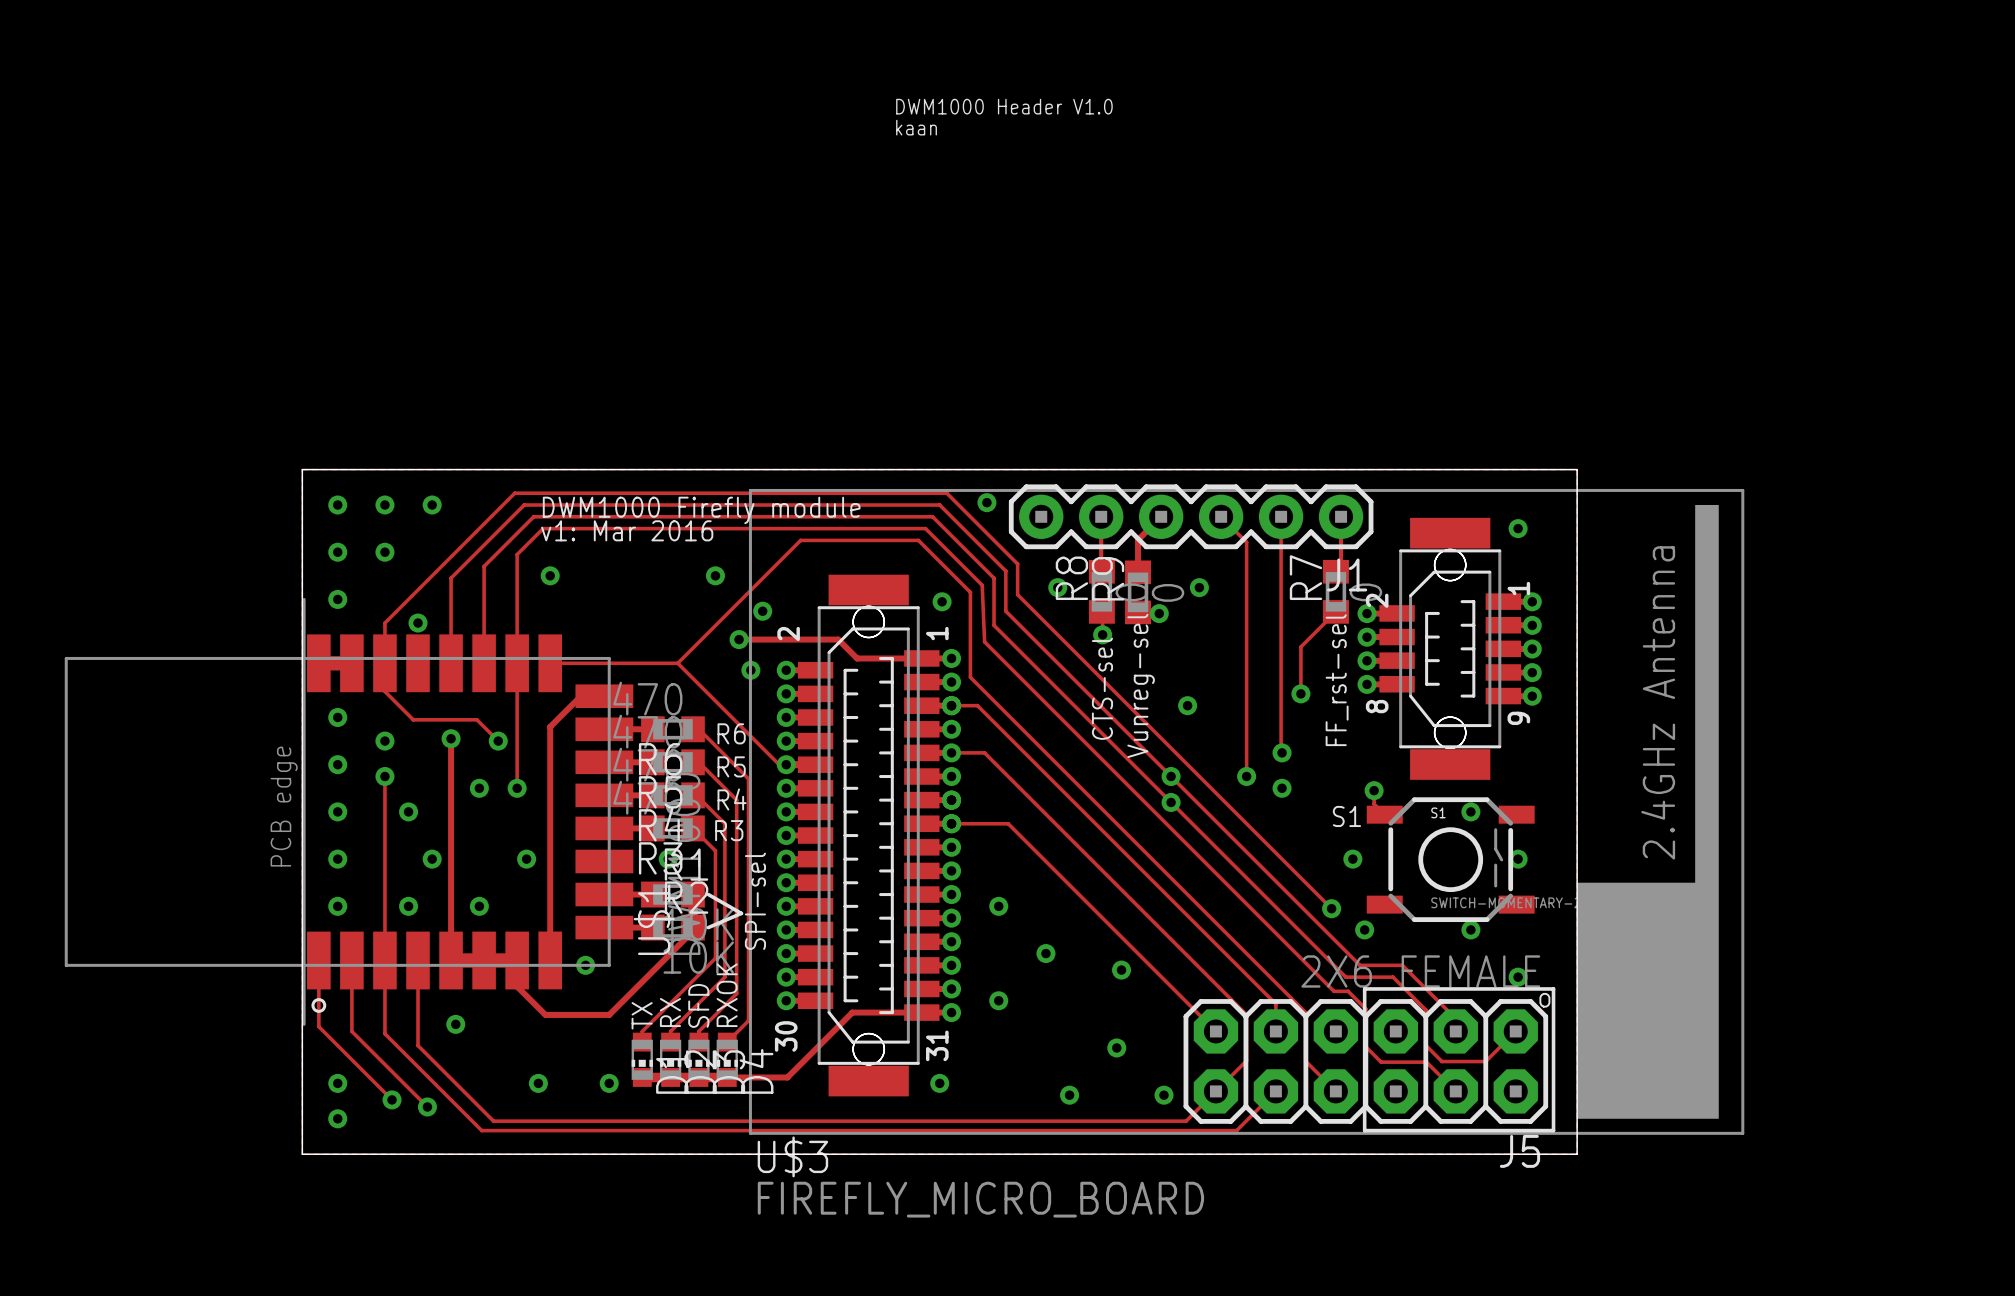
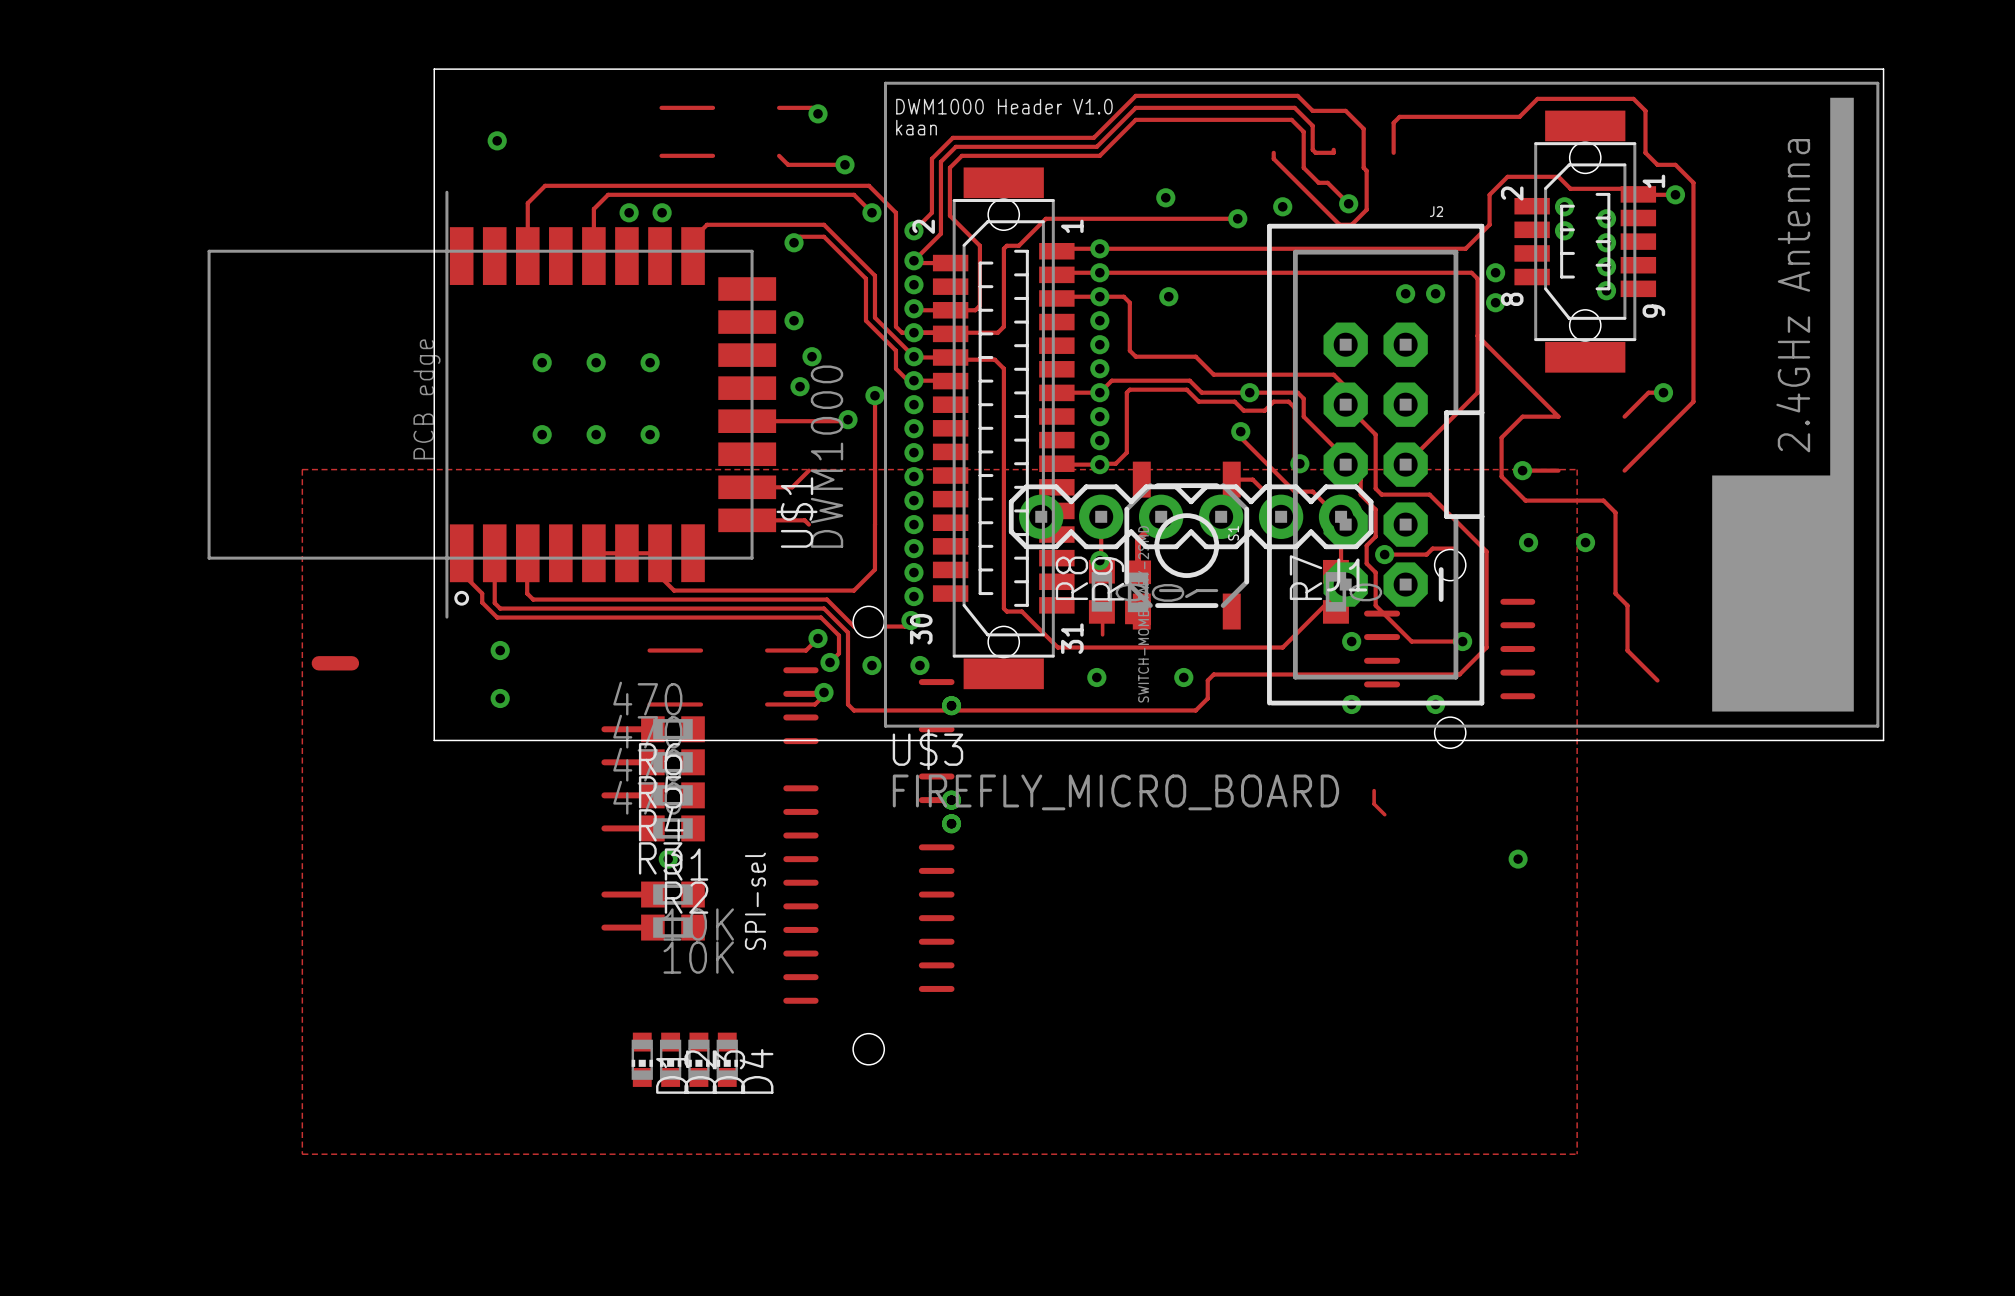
board edge: none -> (434, 69) (1883, 69) (1883, 740) (434, 740) (434, 69)
track: none -> (661, 107) (713, 107)
track: none -> (779, 107) (812, 107) (818, 113)
via: none -> (818, 113)
via: none -> (497, 140)
track: none -> (1333, 149) (1333, 152) (1315, 152) (1312, 149) (1312, 125) (1294, 107) (1135, 107) (1096, 146) (955, 146) (940, 161) (940, 233) (913, 260) (916, 263) (950, 263)
track: none -> (1273, 152) (1273, 158) (1339, 224) (1351, 224) (1366, 209) (1363, 128) (1345, 110) (1312, 110) (1297, 95) (1135, 95) (1093, 137) (952, 137) (931, 158) (931, 212) (913, 230)
track: none -> (1393, 152) (1393, 122) (1399, 116) (1519, 116) (1537, 98) (1633, 98) (1645, 110) (1645, 152) (1657, 164) (1675, 164) (1693, 182) (1693, 401) (1624, 470)
track: none -> (661, 155) (713, 155)
track: none -> (779, 155) (788, 164) (844, 164)
via: none -> (844, 164)
track: none -> (1675, 194) (1638, 194) (1632, 188) (1570, 188) (1558, 176) (1507, 176) (1489, 194) (1489, 224) (1465, 248) (1059, 248) (1056, 251)
via: none -> (1675, 194)
via: none -> (1165, 197)
track: none -> (1348, 203) (1327, 182) (1318, 182) (1303, 167) (1303, 131) (1291, 119) (1135, 119) (1099, 155) (961, 155) (949, 167) (949, 215) (979, 245) (979, 305) (975, 310) (915, 310) (913, 308)
via: none -> (1348, 203)
via: none -> (1282, 206)
via: none -> (1564, 206)
via: none -> (629, 212)
via: none -> (662, 212)
track: none -> (871, 212) (853, 194) (608, 194) (593, 209) (593, 256)
via: none -> (871, 212)
track: none -> (1237, 218) (1045, 218) (1018, 245) (1006, 245) (1003, 248) (1003, 326) (997, 332) (901, 332) (895, 326) (895, 212) (868, 185) (545, 185) (527, 203) (527, 256)
via: none -> (1237, 218)
via: none -> (1606, 218)
via: none -> (913, 230)
via: none -> (1564, 230)
track: none -> (794, 242) (800, 236) (824, 236) (865, 278) (865, 320) (895, 350) (895, 368) (907, 380) (950, 381)
via: none -> (794, 242)
via: none -> (1606, 242)
via: none -> (1099, 248)
track: none -> (693, 256) (693, 238) (707, 224) (824, 224) (874, 275) (874, 317) (914, 357) (994, 359) (1003, 368) (1003, 608) (1006, 611) (1021, 611) (1057, 647) (1282, 647) (1345, 584)
via: none -> (913, 260)
via: none -> (1606, 266)
via: none -> (1099, 272)
via: none -> (1495, 272)
track: none -> (1056, 274) (1058, 272) (1471, 272) (1477, 278) (1477, 392) (1405, 464)
via: none -> (913, 284)
via: none -> (1606, 290)
via: none -> (1405, 293)
via: none -> (1435, 293)
via: none -> (1099, 296)
via: none -> (1168, 296)
track: none -> (1056, 298) (1058, 296) (1123, 296) (1129, 302) (1129, 350) (1135, 356) (1195, 356) (1213, 374) (1333, 374) (1345, 386) (1345, 404) (1375, 434) (1375, 488) (1381, 494) (1429, 494) (1486, 551) (1486, 647) (1459, 674) (1213, 674) (1207, 680) (1207, 698) (1195, 710) (853, 710) (847, 704) (847, 632) (824, 608) (500, 608) (494, 603) (494, 553)
via: none -> (1495, 302)
via: none -> (913, 308)
via: none -> (794, 320)
via: none -> (1099, 320)
via: none -> (913, 332)
track: none -> (1477, 335) (1558, 416) (1522, 416) (1501, 437) (1501, 476) (1525, 500) (1603, 500) (1615, 512) (1615, 593) (1627, 605) (1627, 650) (1657, 680)
via: none -> (1099, 344)
via: none -> (812, 356)
via: none -> (913, 356)
via: none -> (542, 362)
via: none -> (596, 362)
via: none -> (650, 362)
via: none -> (1099, 368)
via: none -> (913, 380)
via: none -> (800, 386)
track: none -> (1057, 392) (1099, 392) (1111, 380) (1189, 380) (1201, 392) (1297, 392) (1303, 398) (1303, 416) (1345, 458) (1345, 464) (1360, 479) (1360, 494) (1375, 509) (1375, 536) (1366, 545) (1366, 563) (1375, 572) (1375, 605) (1411, 641) (1462, 641)
via: none -> (1099, 392)
via: none -> (1249, 392)
track: none -> (1663, 392) (1648, 392) (1624, 416)
via: none -> (1663, 392)
via: none -> (874, 395)
track: none -> (875, 395) (874, 569) (853, 590) (674, 590) (659, 576) (659, 553) (593, 553)
via: none -> (913, 404)
via: none -> (1099, 416)
track: none -> (847, 419) (846, 421) (747, 421)
via: none -> (847, 419)
via: none -> (913, 428)
track: none -> (1240, 431) (1240, 437) (1294, 491) (1312, 491) (1345, 524)
via: none -> (1240, 431)
via: none -> (542, 434)
via: none -> (596, 434)
via: none -> (650, 434)
via: none -> (1099, 440)
via: none -> (913, 452)
track: none -> (1056, 463) (1115, 463) (1126, 452) (1126, 392) (1129, 389) (1186, 389) (1198, 401) (1234, 401) (1243, 410) (1264, 410) (1273, 401) (1288, 401) (1294, 407) (1294, 458) (1299, 463)
via: none -> (1299, 463)
via: none -> (1099, 464)
J2: none -> (1375, 464)
board edge: (302, 469) (1577, 469) (1577, 1154) (302, 1154) (302, 469) -> none
track: none -> (808, 470) (792, 487) (747, 487)
track: none -> (1522, 470) (1558, 470)
via: none -> (1522, 470)
via: none -> (913, 476)
track: none -> (1231, 479) (1252, 479) (1261, 488)
via: none -> (913, 500)
via: (986, 502) -> none
via: (337, 505) -> none
via: (384, 505) -> none
via: (432, 505) -> none
text: DWM1000 Firefly module (701, 510) -> none
track: (1221, 516) (1246, 542) (1246, 776) -> none
track: (1281, 516) (1282, 752) -> none
track: none -> (747, 520) (804, 520) (808, 524)
via: none -> (913, 524)
via position: (1518, 528) -> (1528, 542)
text: v1: Mar 2016 (627, 530) -> none
via: none -> (1585, 542)
via: none -> (913, 548)
track: none -> (1453, 548) (1432, 548) (1426, 554) (1384, 554)
via: (337, 552) -> none
via: (384, 552) -> none
track: none -> (461, 553) (461, 573) (482, 593) (482, 602) (497, 617) (821, 617) (838, 635) (838, 653) (830, 662)
track: none -> (527, 553) (527, 593) (533, 599) (827, 599) (853, 626) (904, 626) (910, 620)
via: none -> (1384, 554)
via: none -> (1099, 560)
via: none -> (913, 572)
via: (550, 575) -> none
via: (715, 575) -> none
via: (1057, 587) -> none
via: (1199, 587) -> none
via: none -> (913, 596)
via: (337, 599) -> none
via: (942, 601) -> none
via: (1532, 601) -> none
via: (762, 611) -> none
track: (1335, 611) (1300, 646) (1300, 693) -> none
via: (1159, 613) -> none
via: (1367, 613) -> none
via: none -> (910, 620)
via: (418, 623) -> none
via: (1532, 625) -> none
via: (1102, 634) -> none
via position: (1367, 637) -> (1351, 641)
track: none -> (818, 638) (806, 650) (767, 650)
via: none -> (818, 638)
track: (739, 639) (838, 639) (857, 658) (951, 658) -> none
via: (739, 639) -> none
via: none -> (1462, 641)
via: (1532, 649) -> none
via: none -> (500, 650)
track: none -> (649, 650) (701, 650)
via: (951, 658) -> none
via: (1367, 660) -> none
via: none -> (830, 662)
track: (451, 663) (451, 578) (524, 505) (939, 505) (1005, 571) (1005, 611) (1359, 965) (1402, 965) (1455, 1018) (1455, 1031) -> none
track: (484, 663) (484, 566) (533, 516) (932, 516) (994, 578) (994, 625) (1345, 977) (1392, 977) (1426, 1010) (1426, 1045) (1441, 1061) (1485, 1061) (1515, 1031) -> none
track: (550, 663) (677, 663) -> none
track: (677, 663) (779, 764) (815, 764) -> none
track: (677, 663) (800, 540) (918, 540) (970, 592) (970, 677) (1305, 1012) (1305, 1061) (1335, 1091) -> none
via: none -> (871, 665)
via: none -> (919, 665)
via: (750, 670) -> none
via: (786, 670) -> none
via: (1532, 672) -> none
via: none -> (1096, 677)
via: none -> (1183, 677)
text: FF_rst-sel (1337, 680) -> none
via: (951, 682) -> none
via: (1367, 684) -> none
text: Vunreg-sel (1141, 685) -> none
text: CTS-sel (1102, 688) -> none
track: none -> (824, 692) (824, 695) (815, 704) (767, 704)
via: none -> (824, 692)
via: (786, 693) -> none
via: (1300, 693) -> none
track: (604, 696) (580, 696) (550, 726) (550, 960) -> none
via: (1532, 696) -> none
via: none -> (500, 698)
track: none -> (649, 704) (701, 704)
via: none -> (1351, 704)
via: none -> (1435, 704)
track: (921, 705) (977, 705) (1275, 1004) (1275, 1031) -> none
via: (1187, 705) -> none
via: (337, 717) -> none
via: (786, 717) -> none
track: (693, 729) (698, 729) (748, 778) (748, 1020) (727, 1042) -> none
via: (951, 729) -> none
text: R6 (731, 733) -> none
track: (451, 738) (451, 960) (517, 960) (517, 986) (545, 1014) (609, 1014) (693, 931) (693, 894) -> none
via: (451, 738) -> none
via: (384, 741) -> none
track: (498, 741) (477, 719) (413, 719) (384, 691) (384, 623) (514, 493) (946, 493) (1017, 564) (1017, 594) (1331, 908) -> none
via: (498, 741) -> none
via: (786, 741) -> none
track: (921, 752) (984, 752) (1246, 1014) (1246, 1060) (1186, 1121) (493, 1121) (418, 1045) (418, 960) -> none
via: (951, 752) -> none
via: (1282, 752) -> none
track: (693, 762) (698, 762) (736, 800) (736, 993) (698, 1031) (698, 1042) -> none
via: (337, 764) -> none
via: (786, 764) -> none
text: R5 (731, 766) -> none
track: (384, 776) (384, 1033) (481, 1130) (1236, 1130) (1275, 1091) -> none
via: (384, 776) -> none
via: (951, 776) -> none
via: (1171, 776) -> none
via: (1246, 776) -> none
via: (479, 788) -> none
track: (517, 788) (517, 554) (543, 528) (925, 528) (982, 585) (984, 641) (1333, 991) (1348, 991) (1365, 1009) (1365, 1046) (1381, 1062) (1426, 1062) (1455, 1091) -> none
via: (517, 788) -> none
via: (786, 788) -> none
via: (1282, 788) -> none
via: (1374, 790) -> none
track: (693, 795) (696, 795) (724, 823) (724, 977) (670, 1031) (670, 1042) -> none
text: R4 (732, 799) -> none
via: (1171, 802) -> none
via: (337, 811) -> none
U$1 position: (349, 811) -> (491, 404)
via: (408, 811) -> none
via: (786, 811) -> none
U$3 position: (1246, 811) -> (1381, 404)
via: (1470, 811) -> none
text: S1 (1346, 816) -> none
track: (921, 823) (1008, 823) (1215, 1031) -> none
track: (693, 828) (715, 850) (715, 958) (642, 1031) (642, 1042) -> none
text: R3 (729, 830) -> none
via: (786, 835) -> none
via: (951, 847) -> none
via: (337, 859) -> none
via: (432, 859) -> none
via: (526, 859) -> none
via: (786, 859) -> none
via: (1352, 859) -> none
S1 rotation: 0° (1450, 859) -> 90° clockwise (1186, 545)
S1 position: (1450, 859) -> (1186, 545)
via: (951, 870) -> none
via: (786, 882) -> none
line: (708, 894) (741, 913) (708, 927) -> none
via: (951, 894) -> none
via: (337, 906) -> none
via: (408, 906) -> none
via: (479, 906) -> none
via: (786, 906) -> none
via: (998, 906) -> none
via: (1331, 908) -> none
via: (951, 918) -> none
via: (786, 929) -> none
via: (1364, 929) -> none
via: (1470, 929) -> none
via: (951, 941) -> none
via: (786, 953) -> none
via: (1045, 953) -> none
track: (318, 960) (318, 1026) (392, 1099) -> none
track: (351, 960) (351, 1031) (427, 1106) -> none
via: (585, 965) -> none
via: (951, 965) -> none
via: (1121, 970) -> none
via: (786, 977) -> none
via: (1518, 977) -> none
via: (951, 988) -> none
line: (1364, 988) (1553, 988) (1553, 1130) (1364, 1130) (1364, 988) -> none
text: RXOK (727, 995) -> none
via: (786, 1000) -> none
via: (998, 1000) -> none
text: o (1544, 1000) -> none
text: SFD (698, 1005) -> none
text: RX (670, 1012) -> none
track: (951, 1012) (852, 1012) (787, 1077) (642, 1077) -> none
via: (951, 1012) -> none
text: TX (642, 1015) -> none
via: (455, 1024) -> none
via: (1116, 1047) -> none
J5: 2X6 FEMALE (1365, 1061) -> none
via: (337, 1083) -> none
via: (538, 1083) -> none
via: (609, 1083) -> none
via: (939, 1083) -> none
via: (1069, 1095) -> none
via: (1164, 1095) -> none
via: (392, 1099) -> none
via: (427, 1106) -> none
via: (337, 1118) -> none

